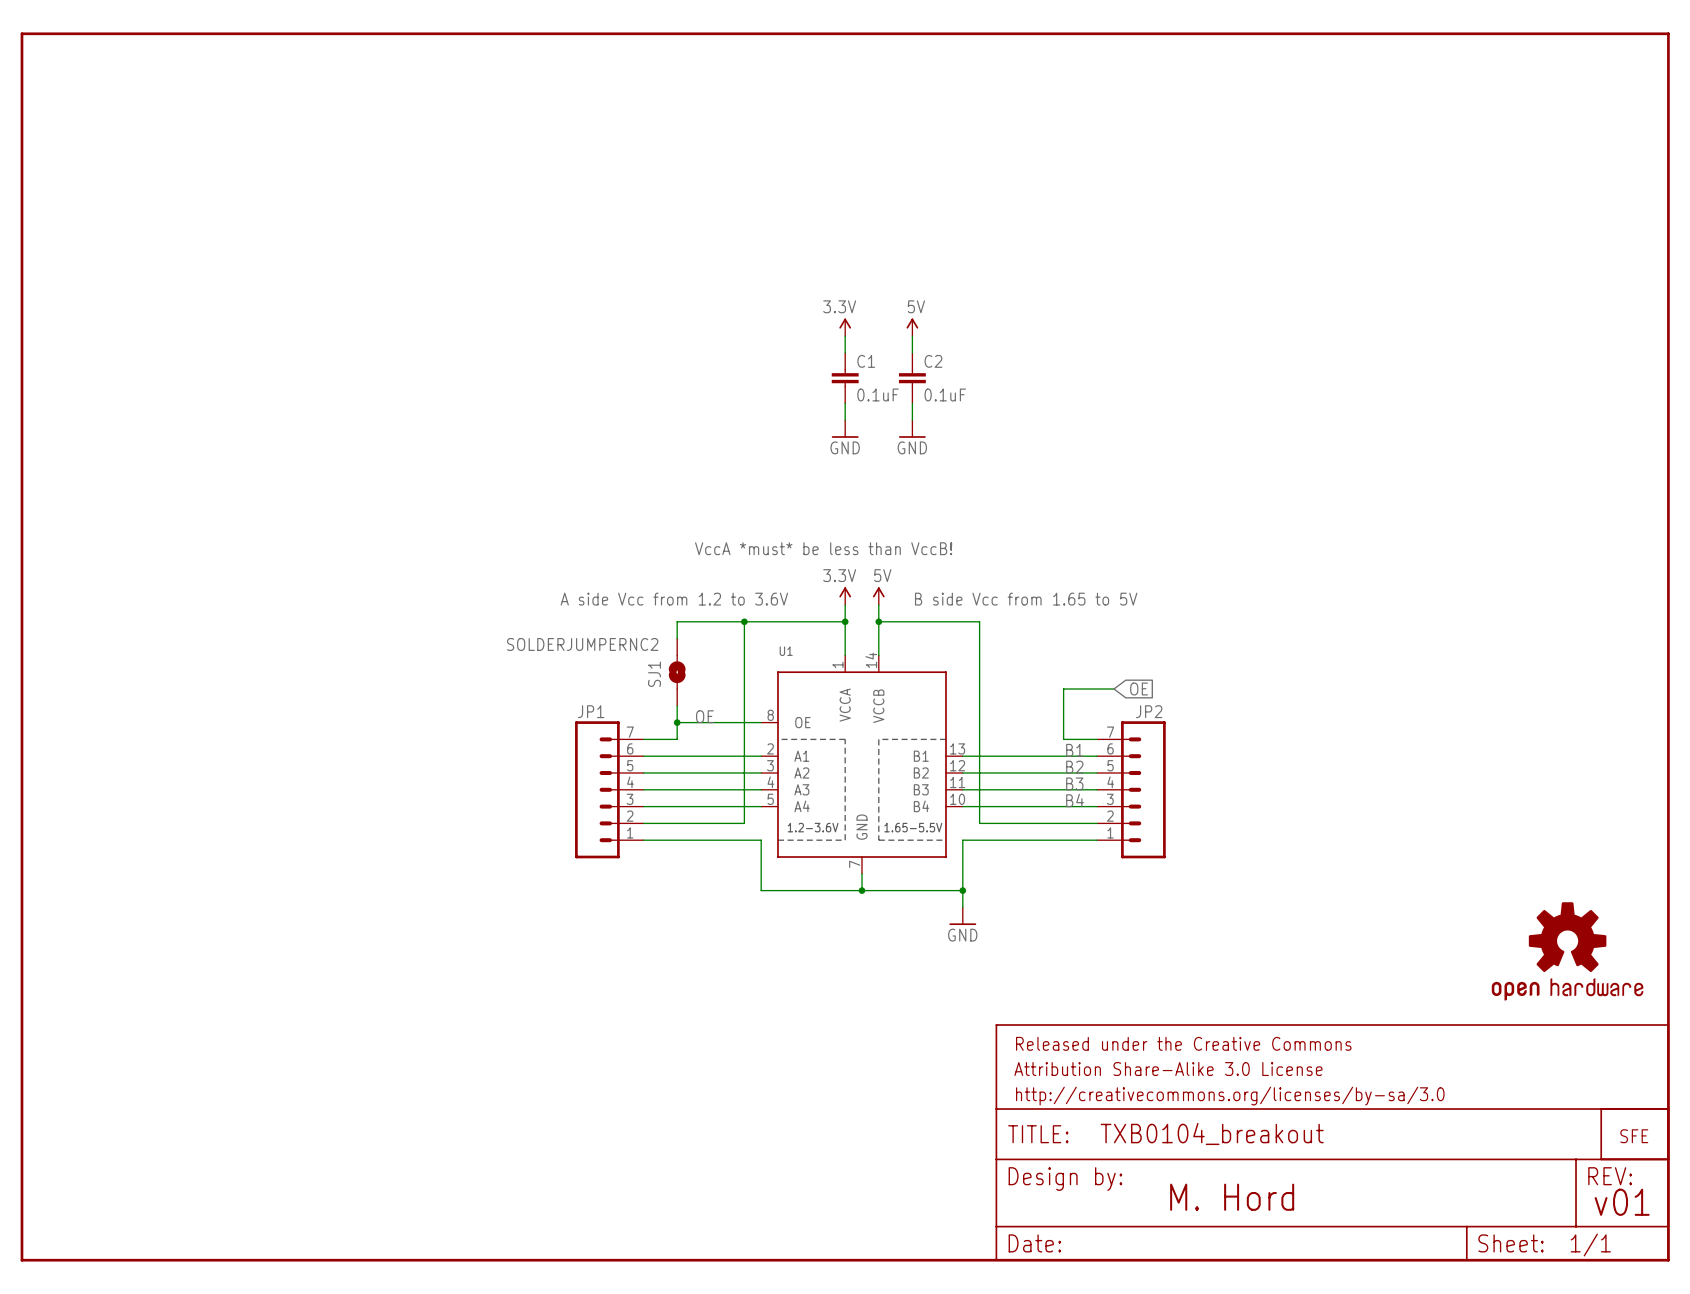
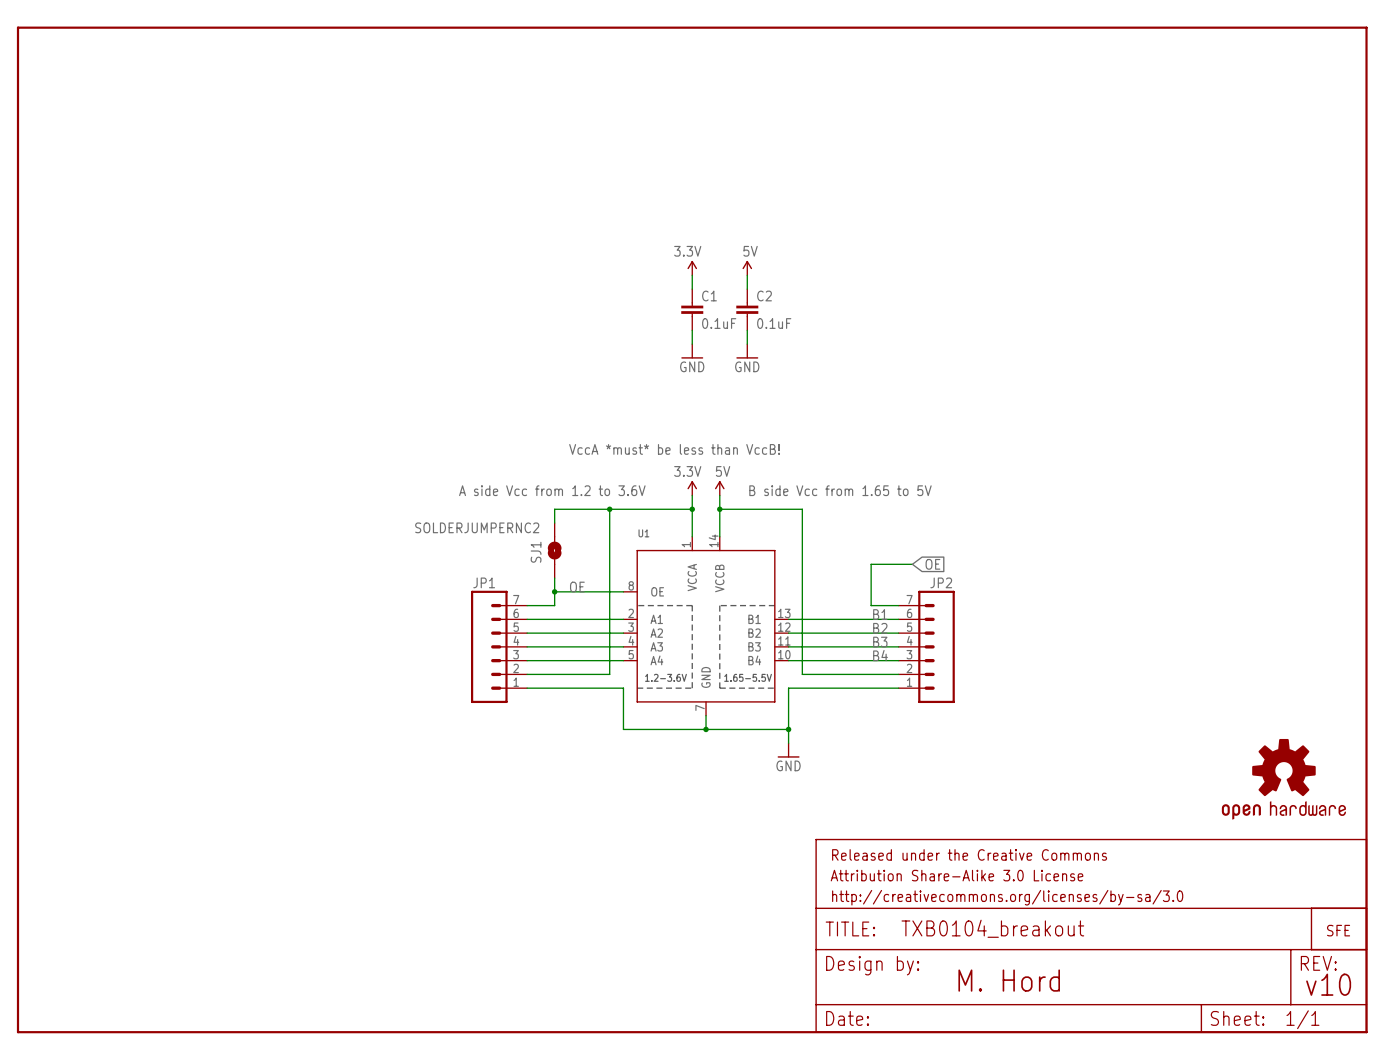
text: v01 (1622, 1202) -> v10 (1328, 984)

